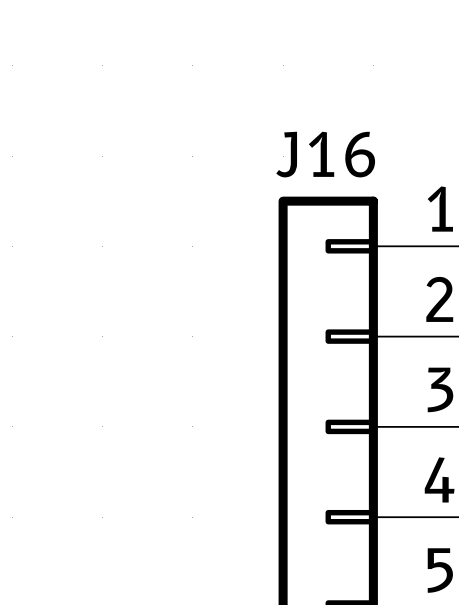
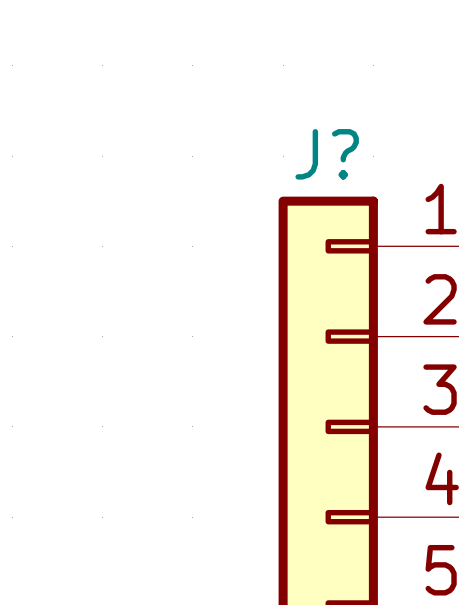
J16 name: J16 (325, 154) -> J? (327, 154)

